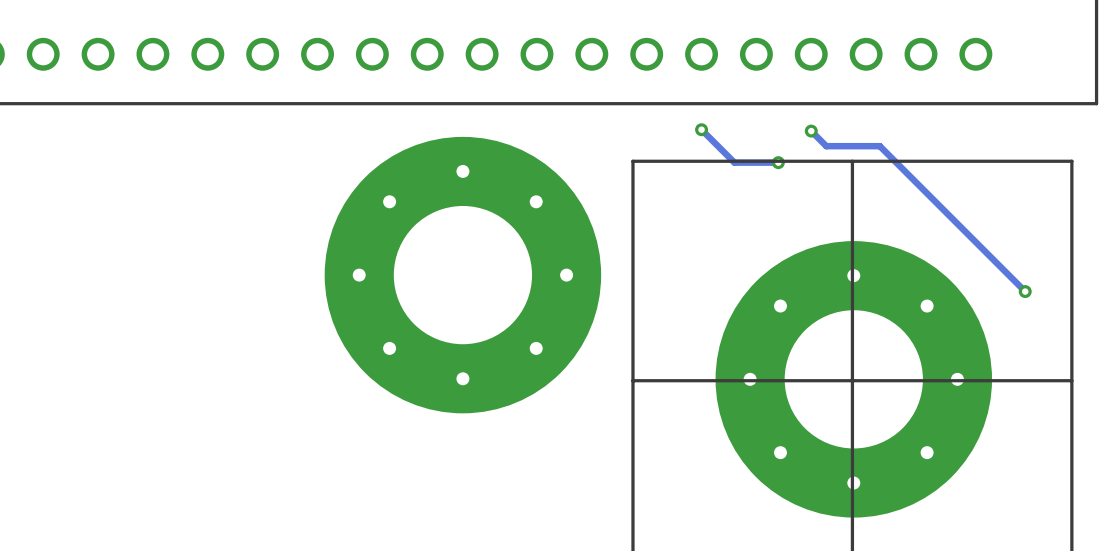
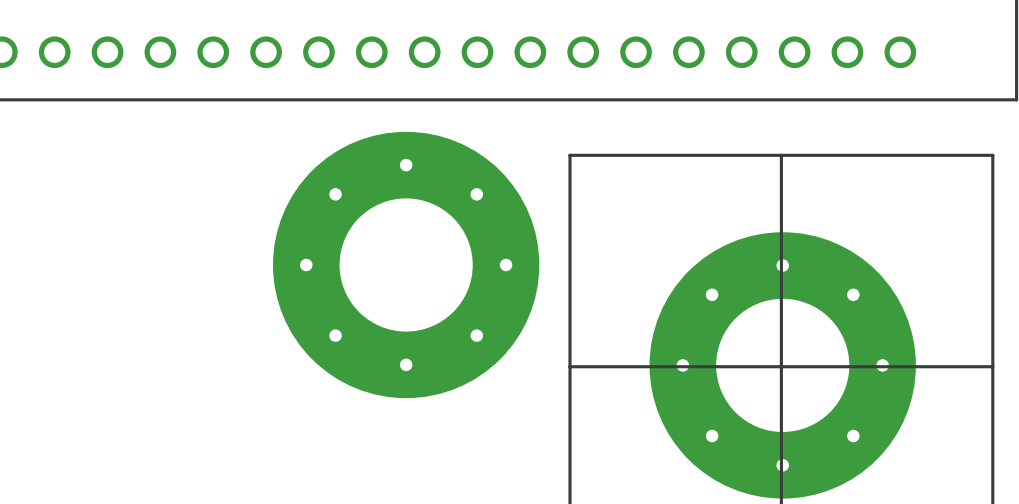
track: (701, 129) (734, 162) (778, 162) -> none
via: (701, 129) -> none
track: (811, 131) (826, 146) (879, 146) (1025, 291) -> none
via: (811, 131) -> none
via: (778, 162) -> none
via: (1025, 291) -> none

